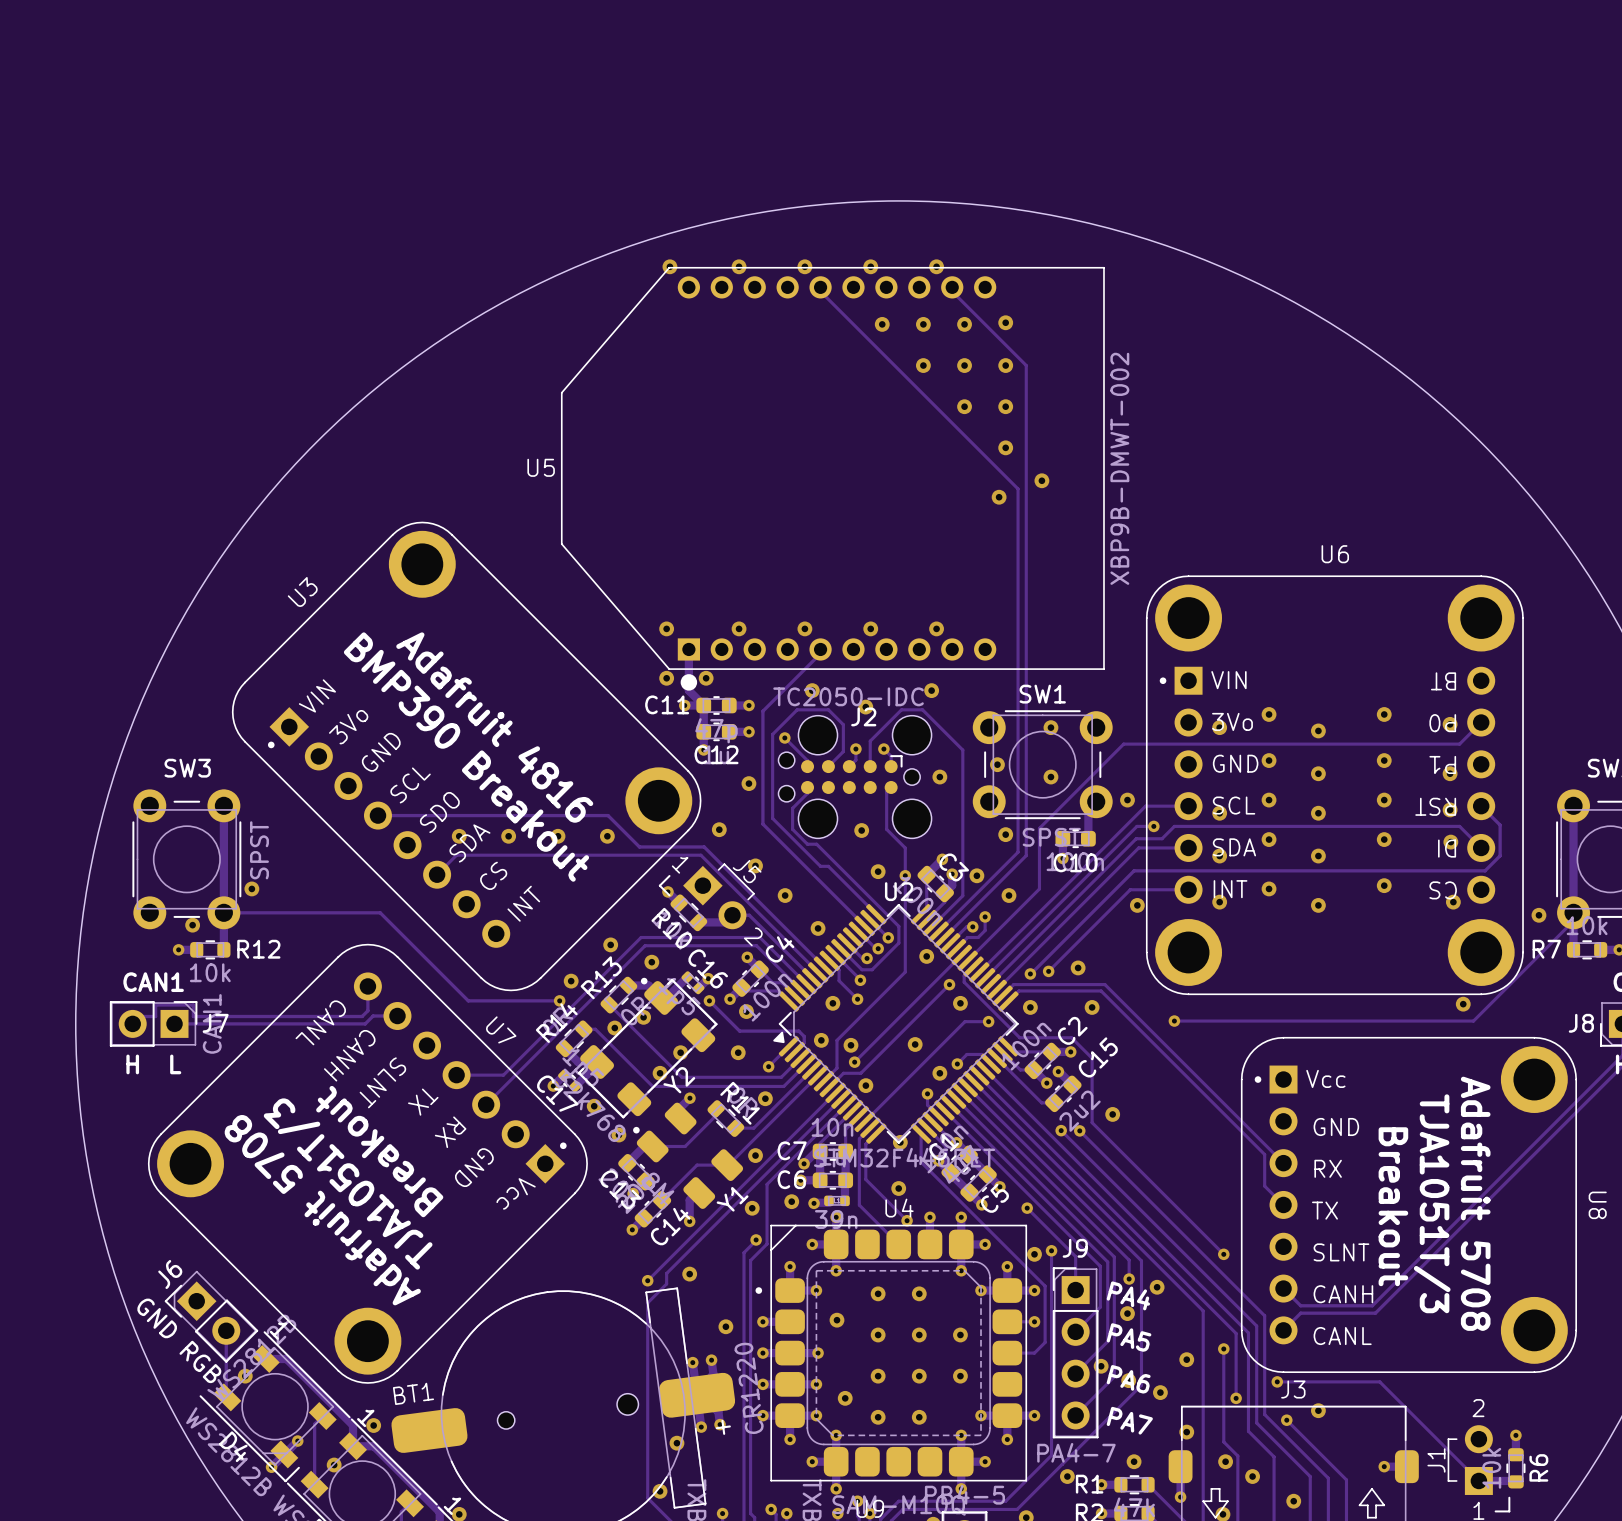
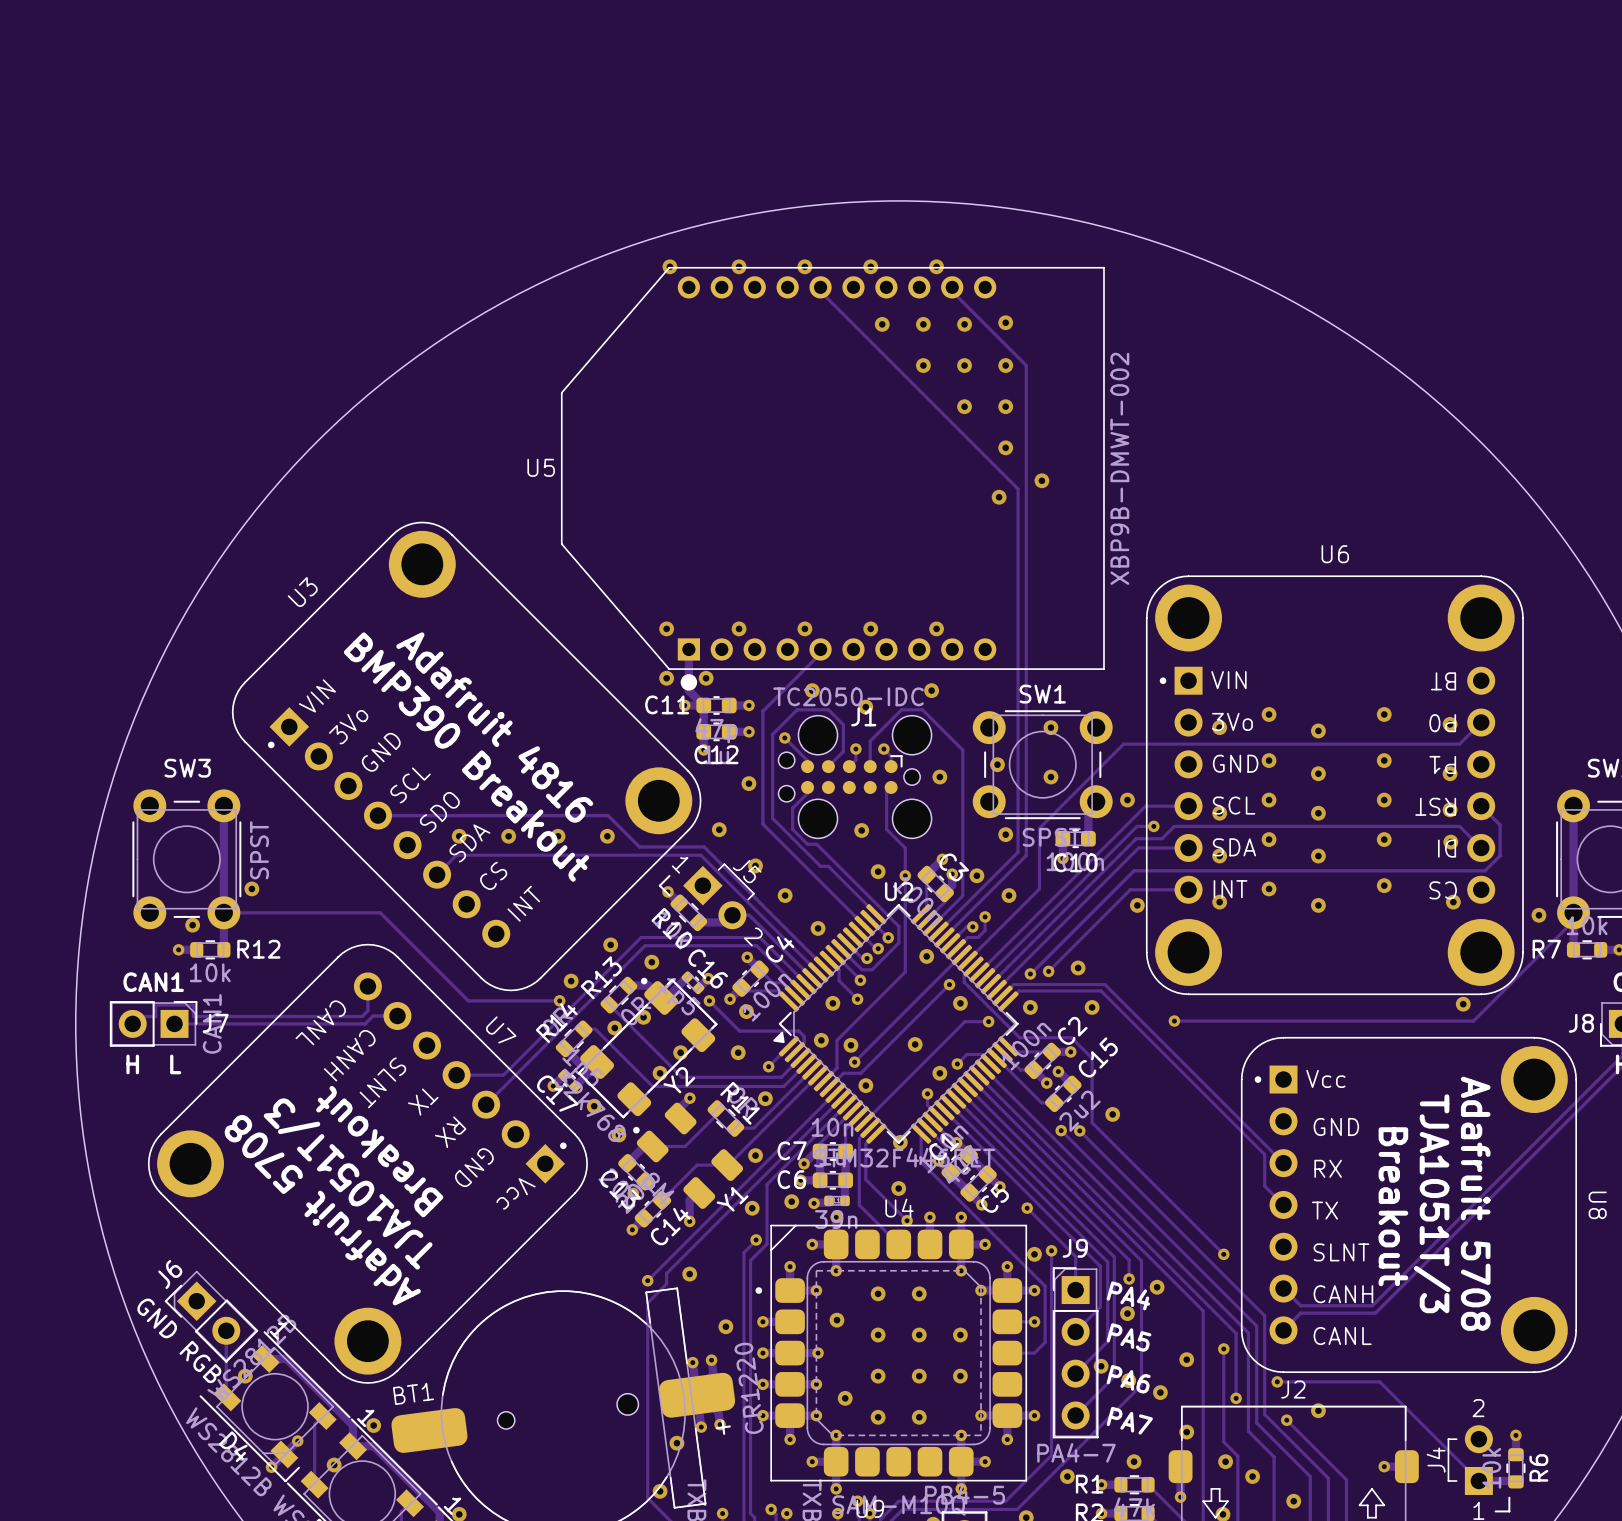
J2 name: J2 (863, 716) -> J1 (863, 716)
J3 name: J3 (1293, 1389) -> J2 (1293, 1389)
J1 name: J1 (1436, 1460) -> J4 (1436, 1460)

